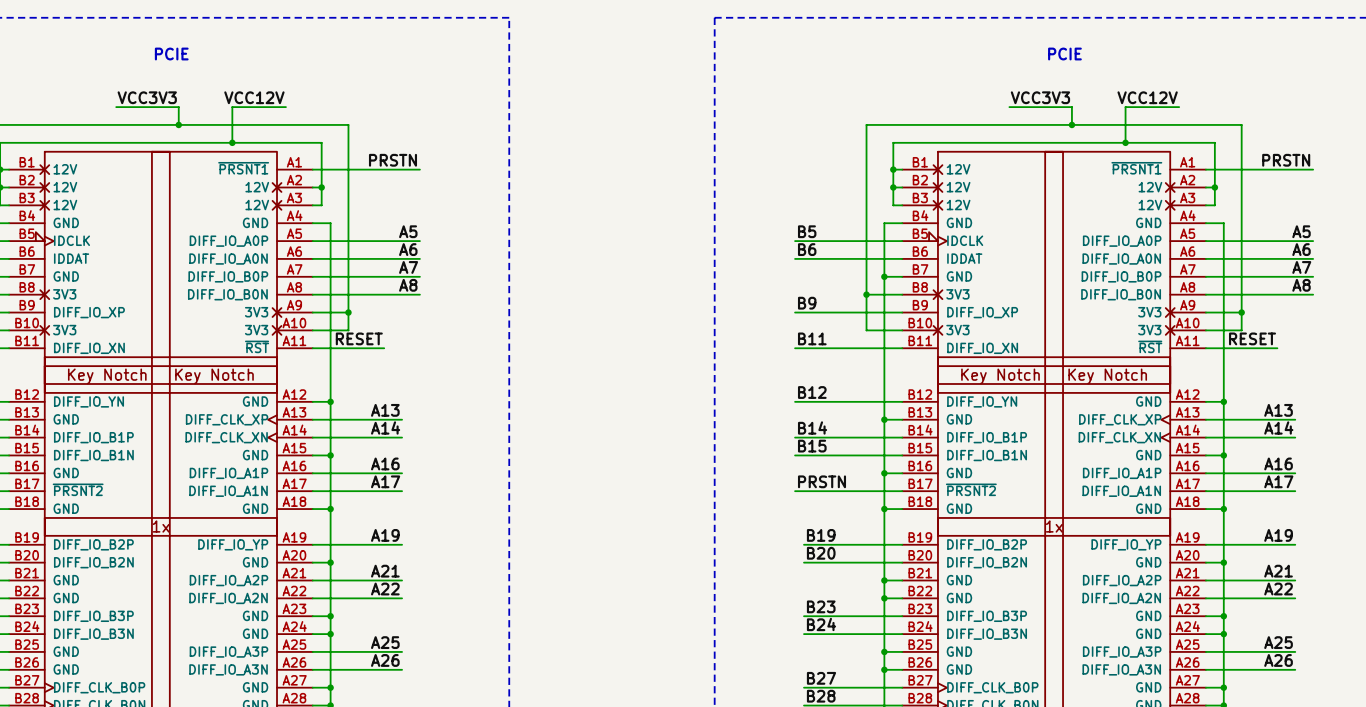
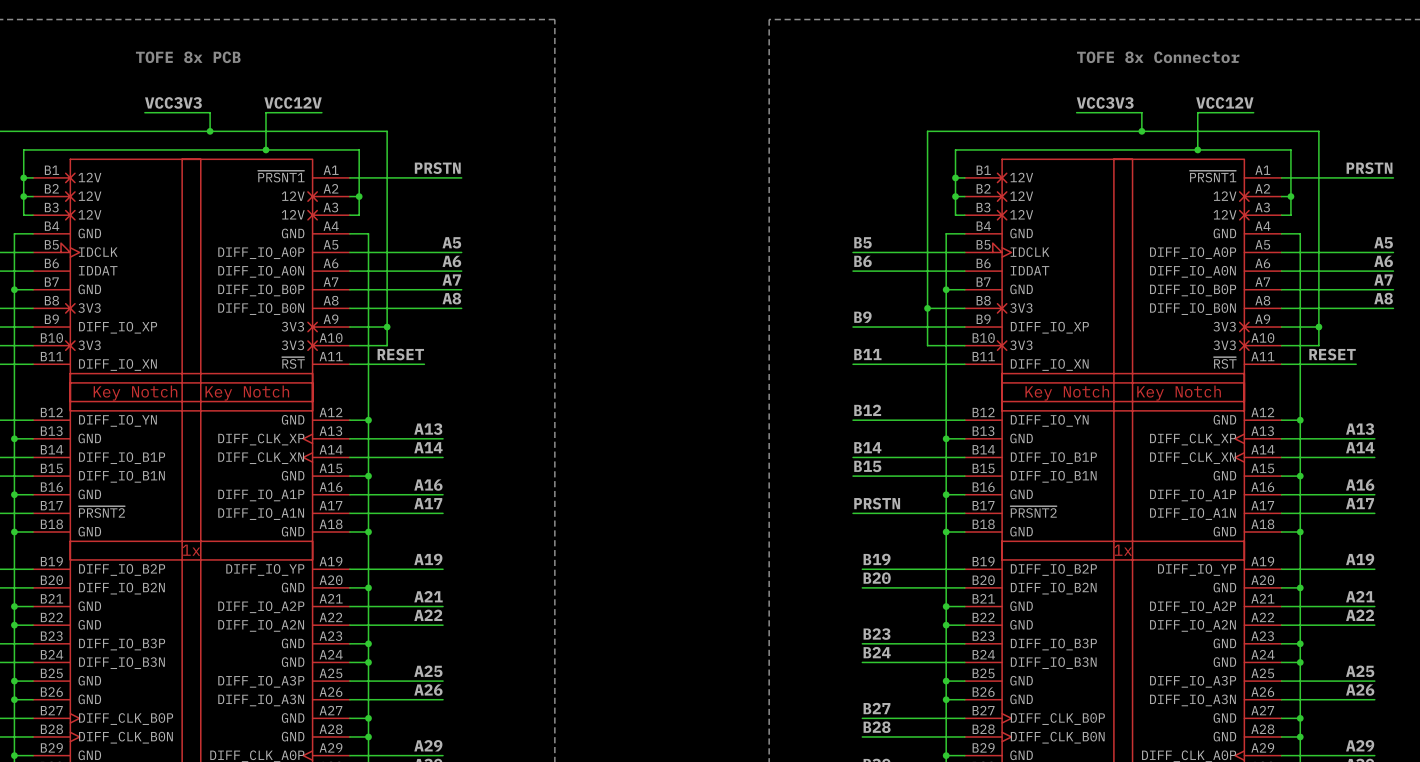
text: none -> TOFE 8x PCB (188, 57)
text: PCIE (171, 54) -> none
text: PCIE (1064, 54) -> none
text: none -> TOFE 8x Connector (1158, 57)

